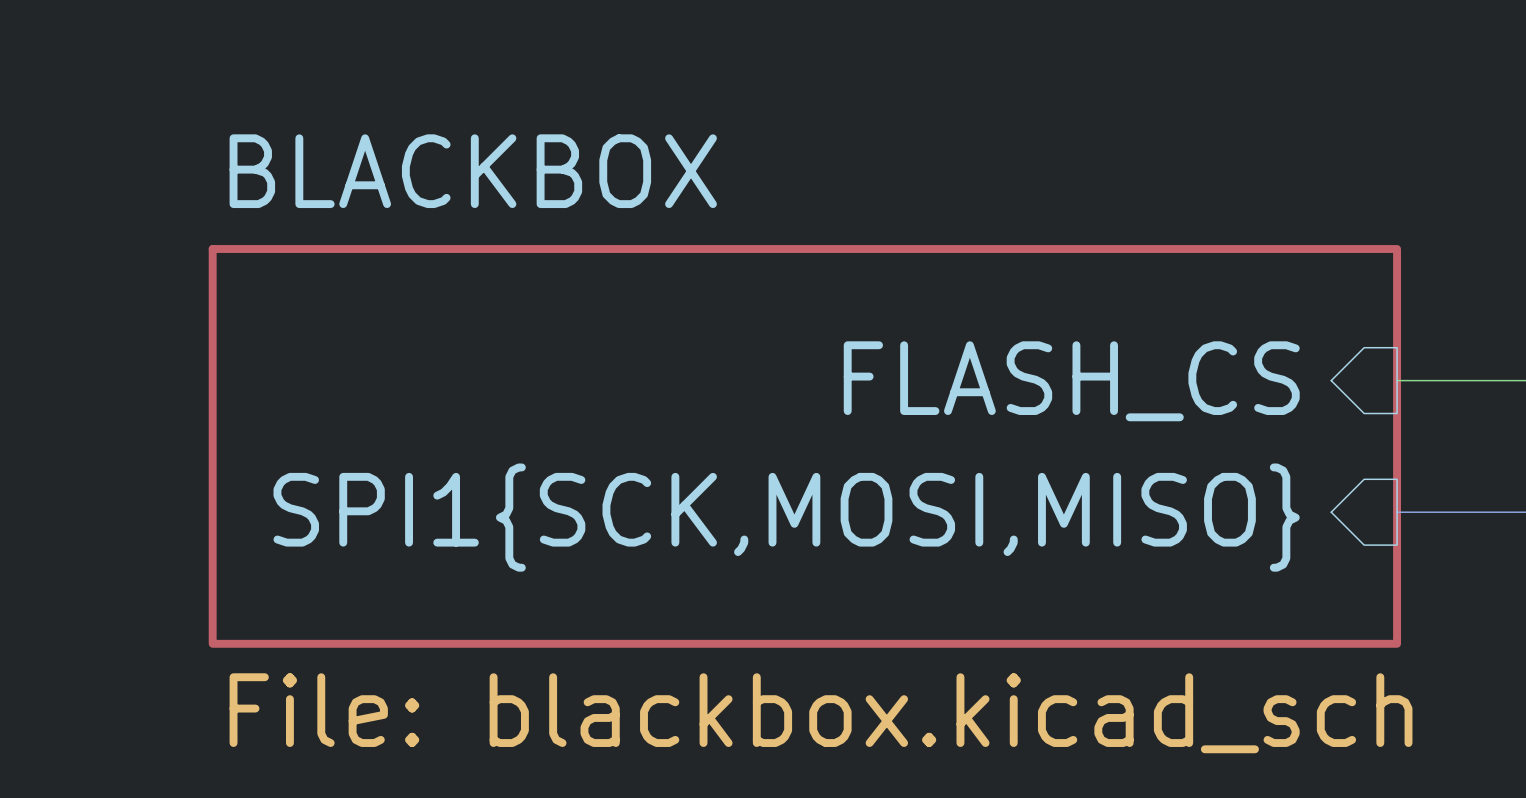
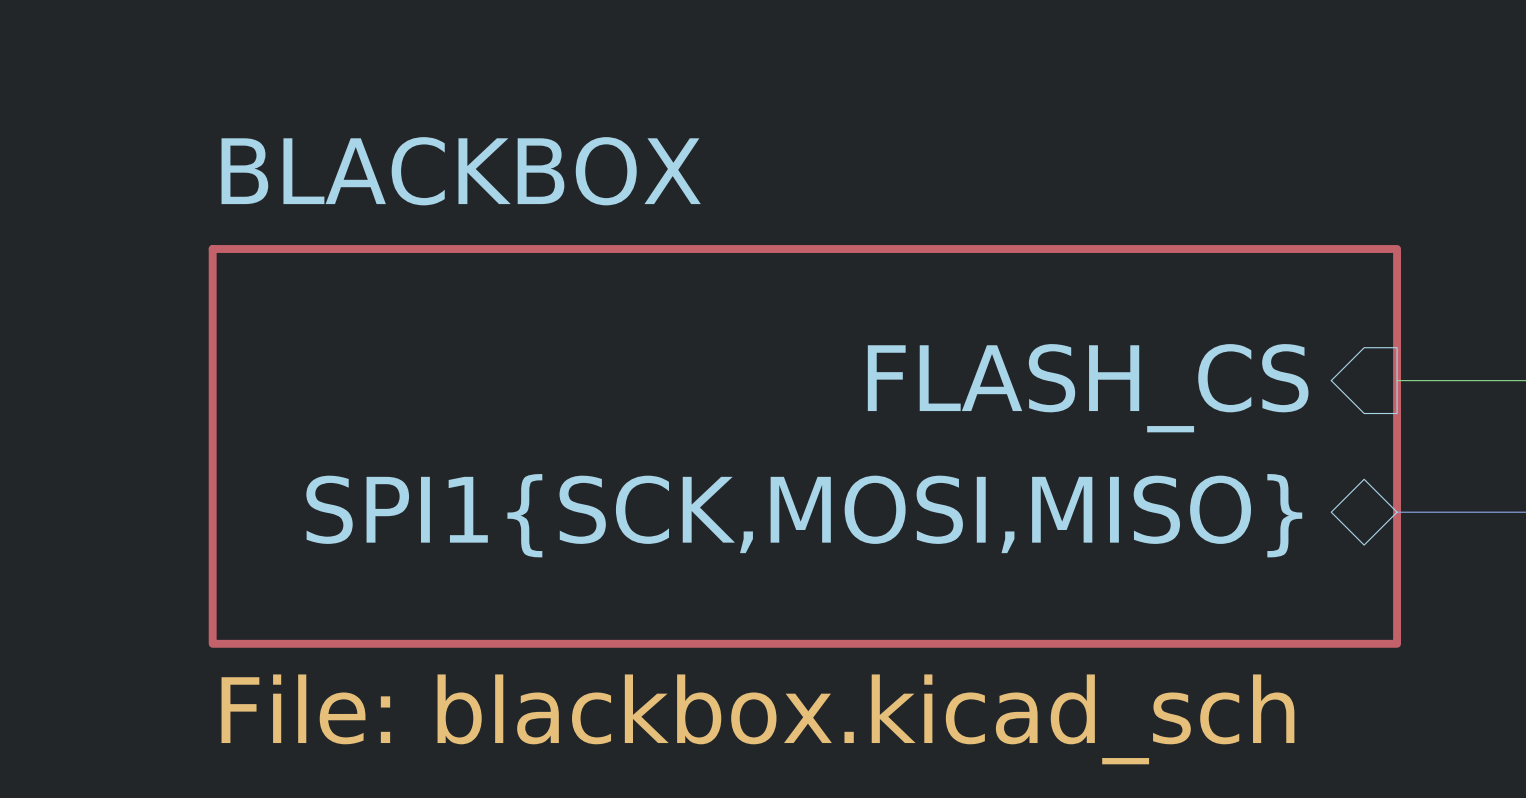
sheet pin shape: input (786, 517) -> bidirectional (804, 515)

